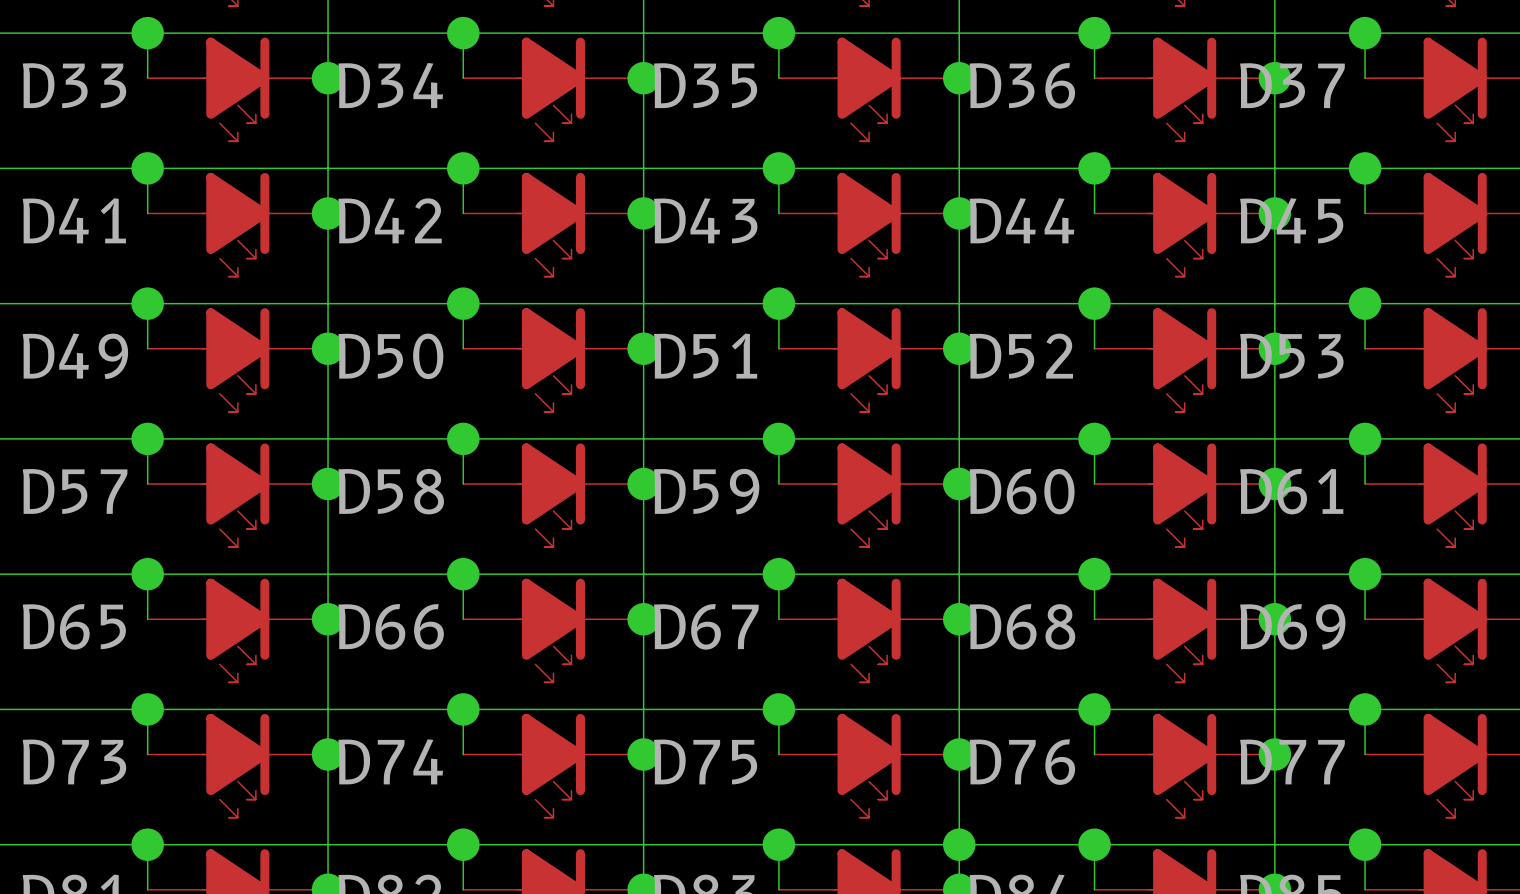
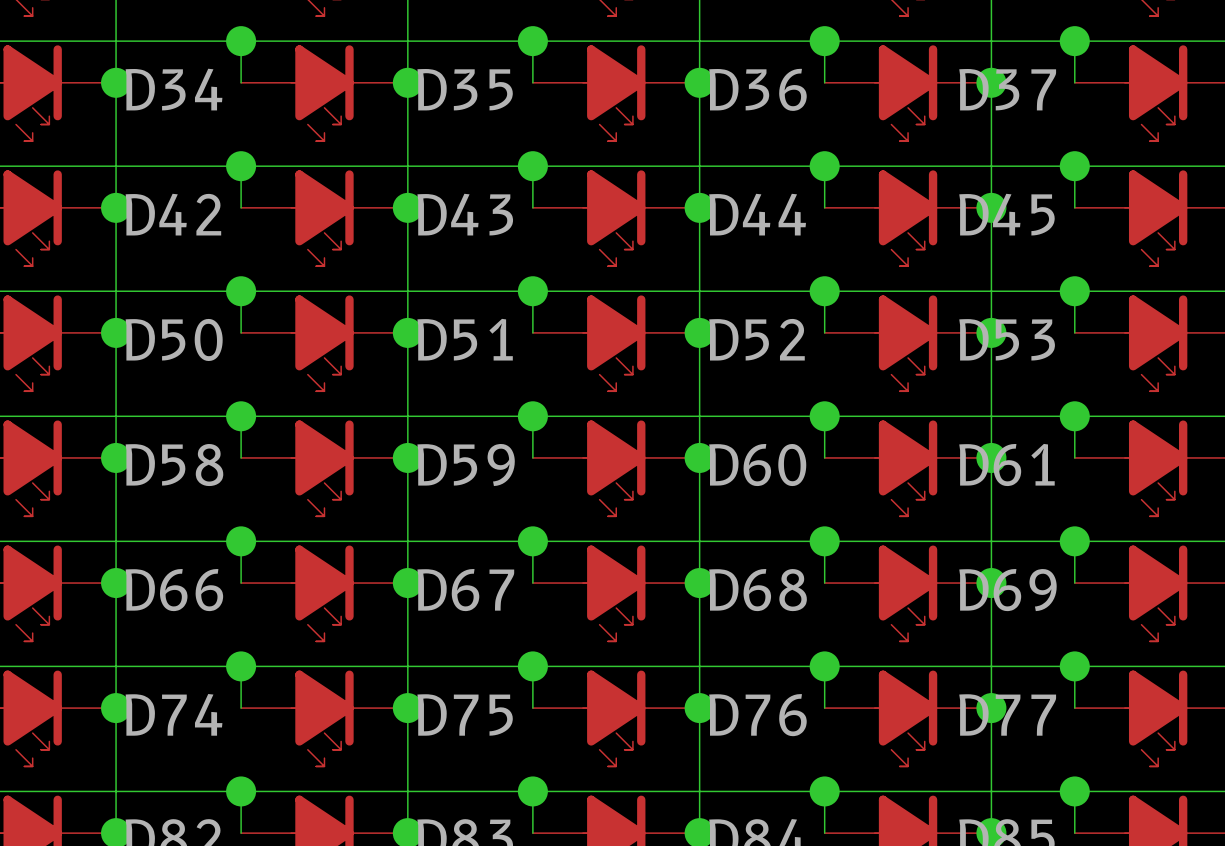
junction: (959, 844) -> none

